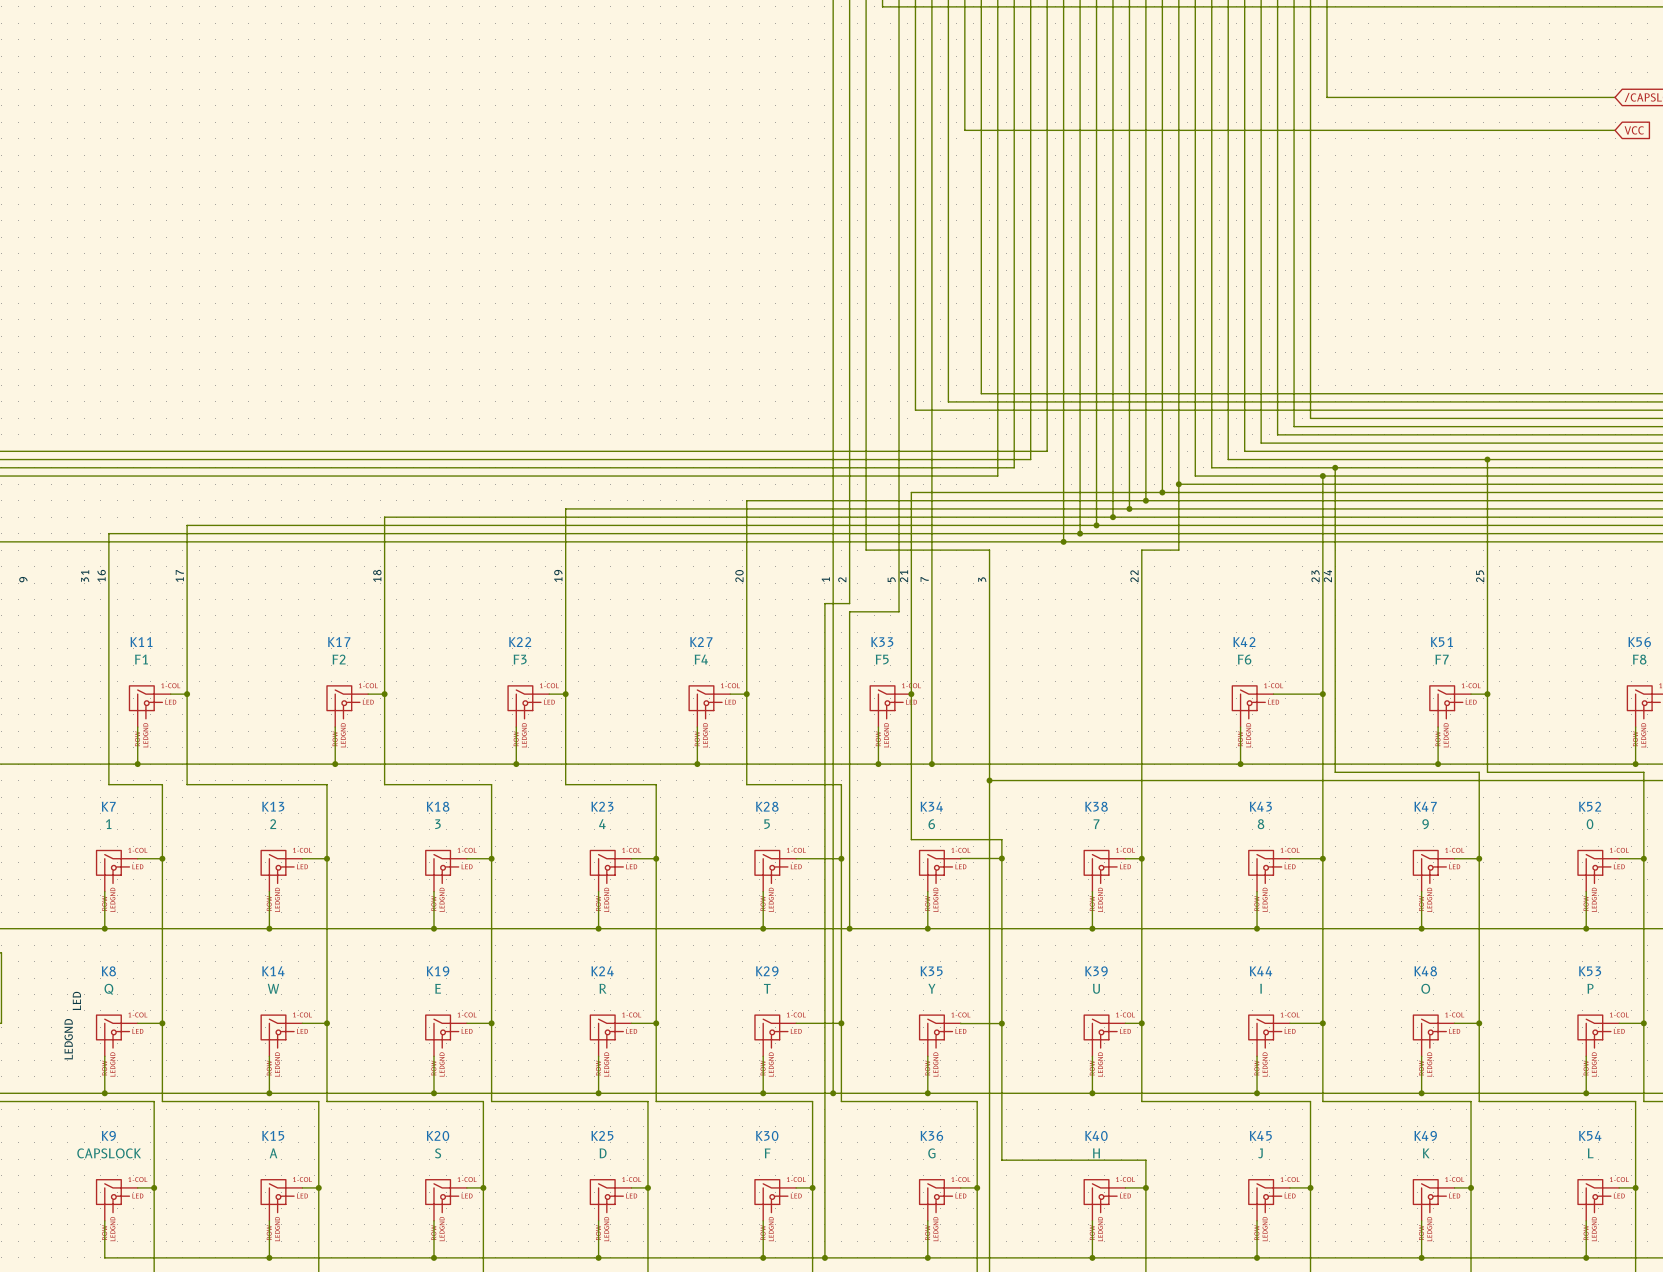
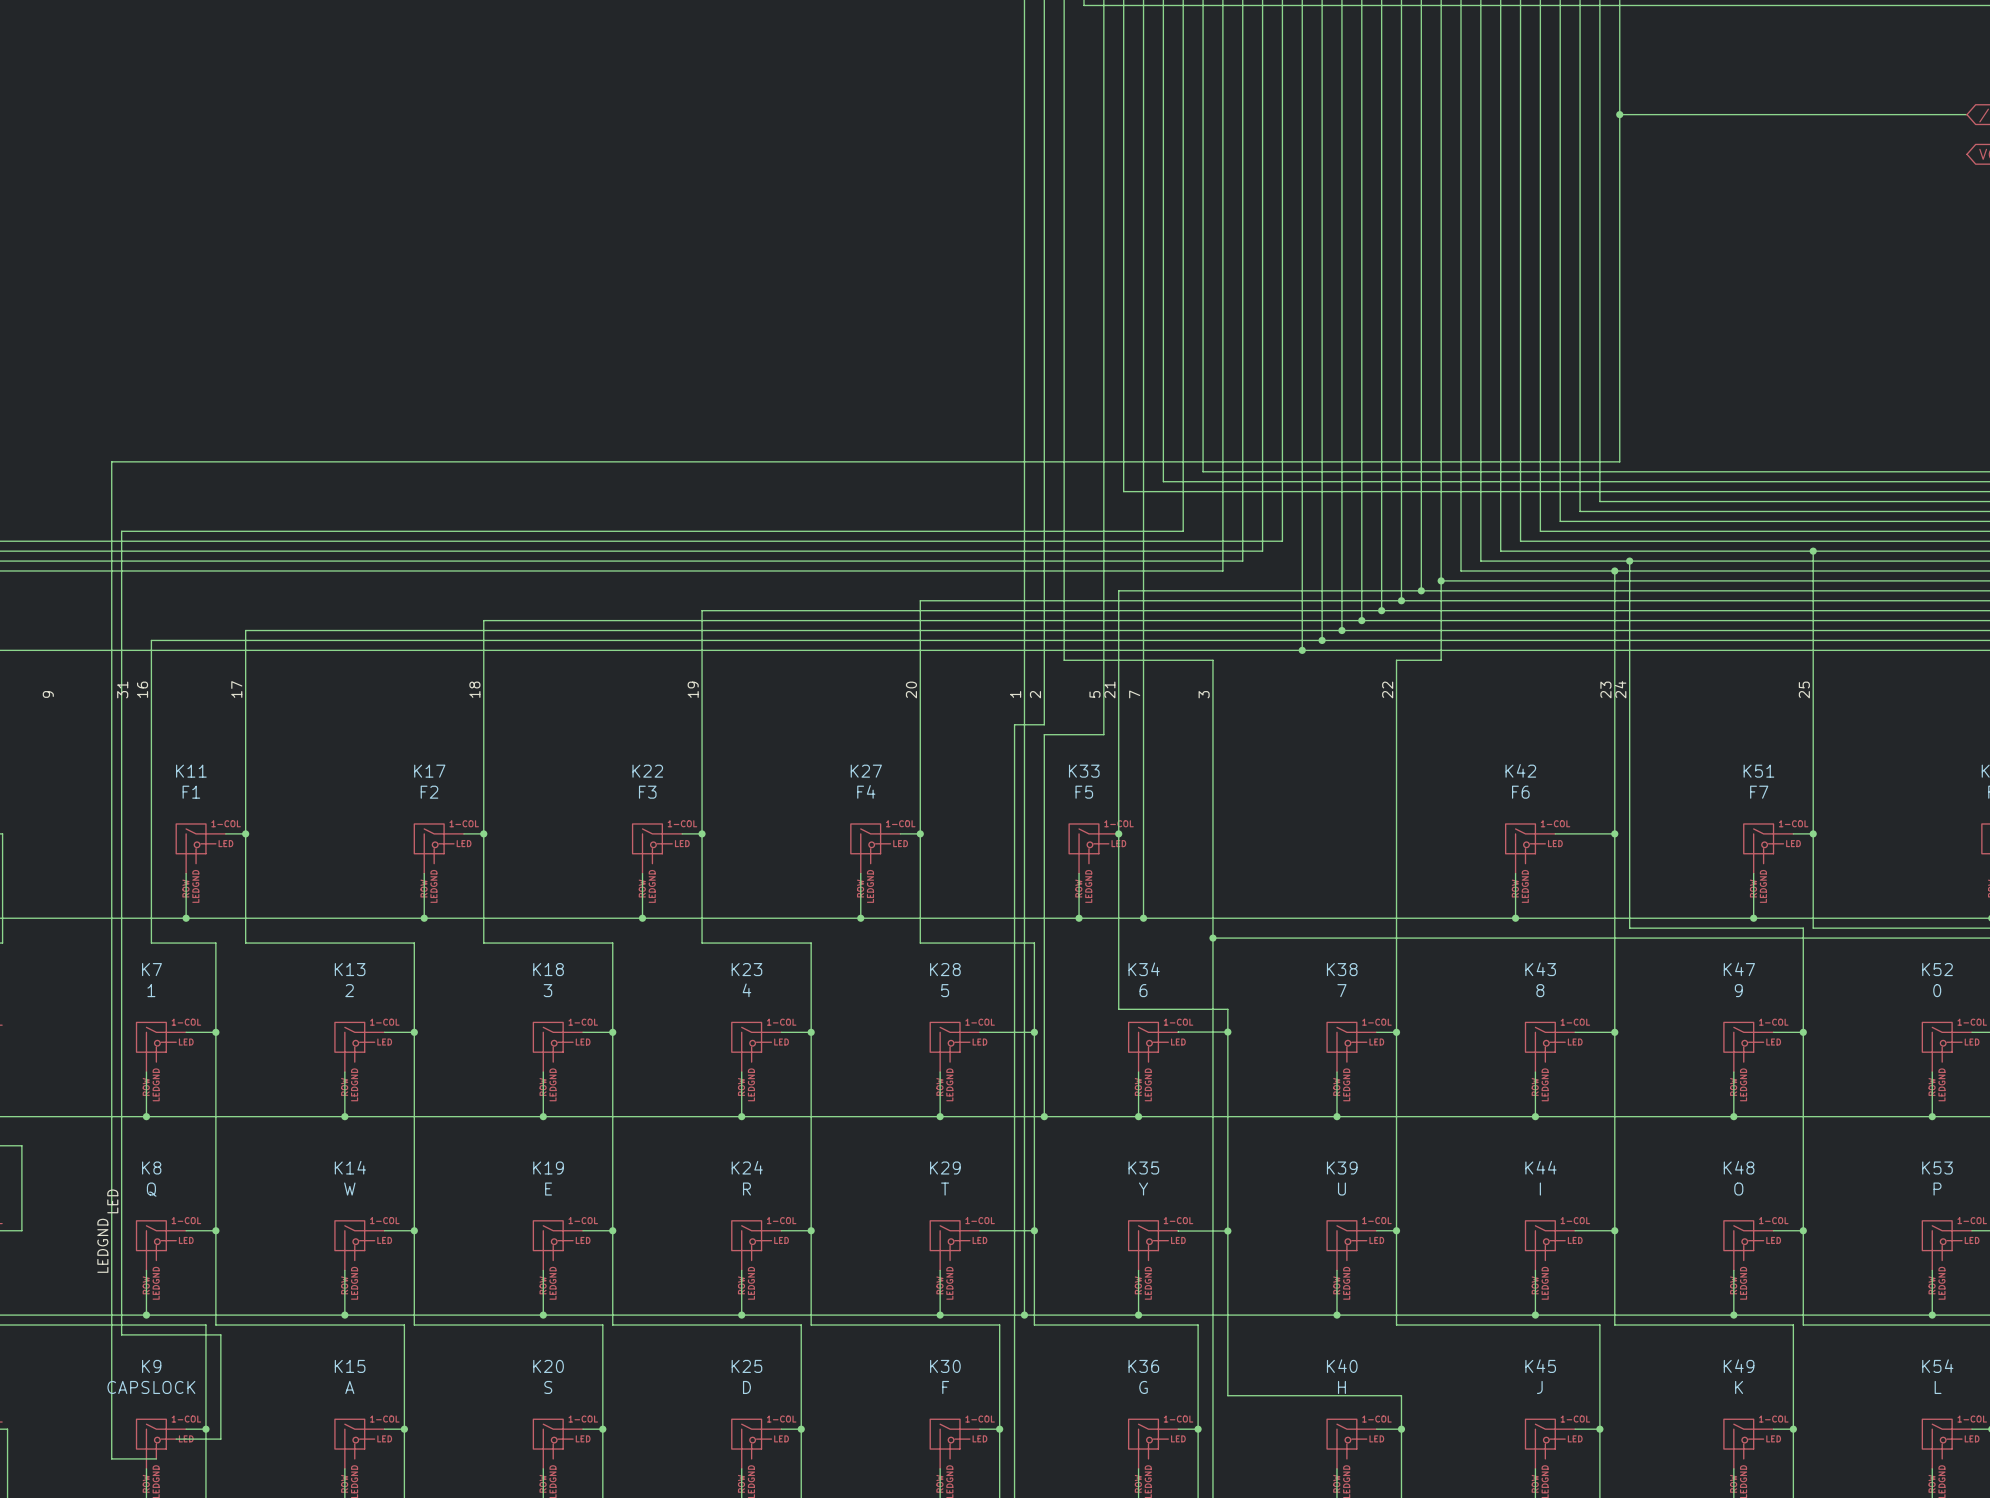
wire: none -> (1619, 114) (1619, 461) (111, 461) (111, 1458) (156, 1458)
junction: none -> (1619, 114)
wire: (964, 130) (1615, 130) -> (1183, 154) (1183, 531) (121, 531) (121, 1334) (220, 1334) (220, 1439) (176, 1439)

